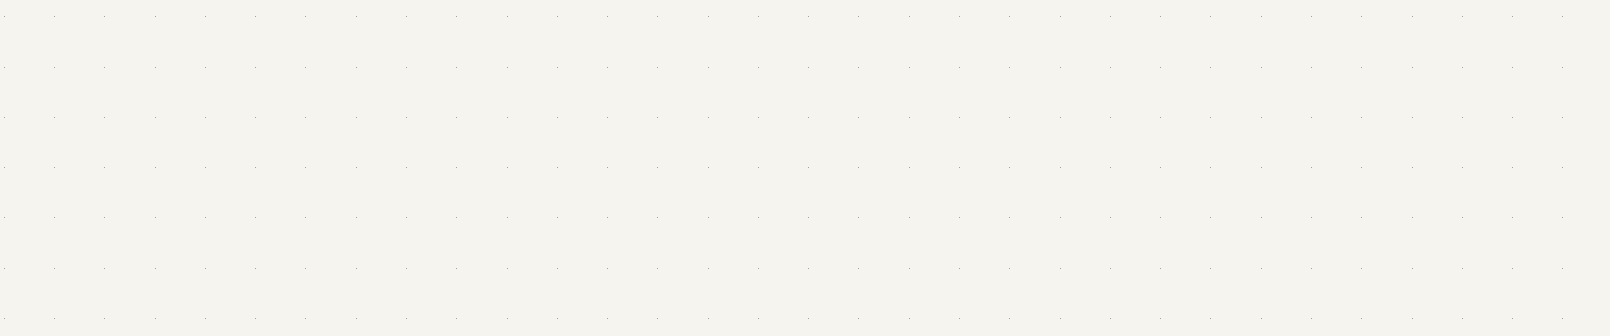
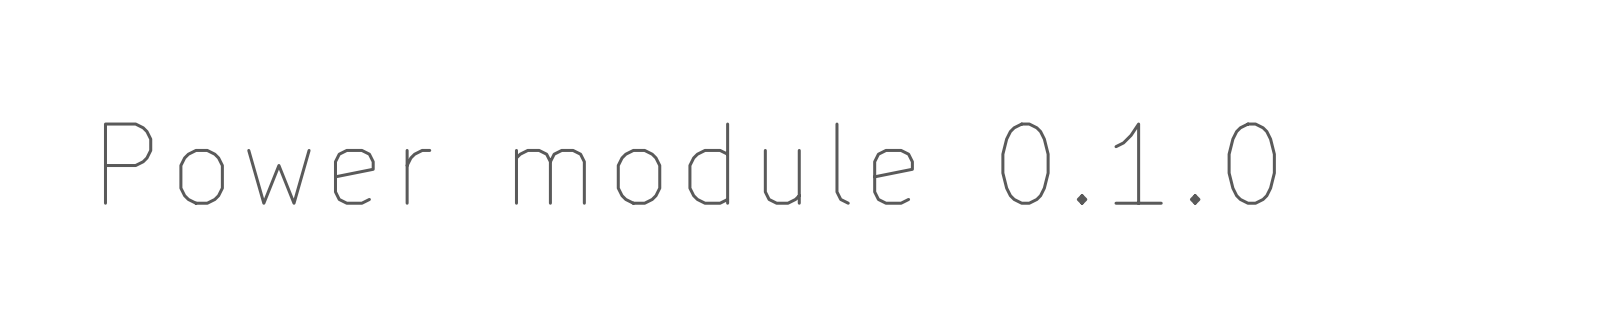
text: none -> Power module 0.1.0 (689, 163)

